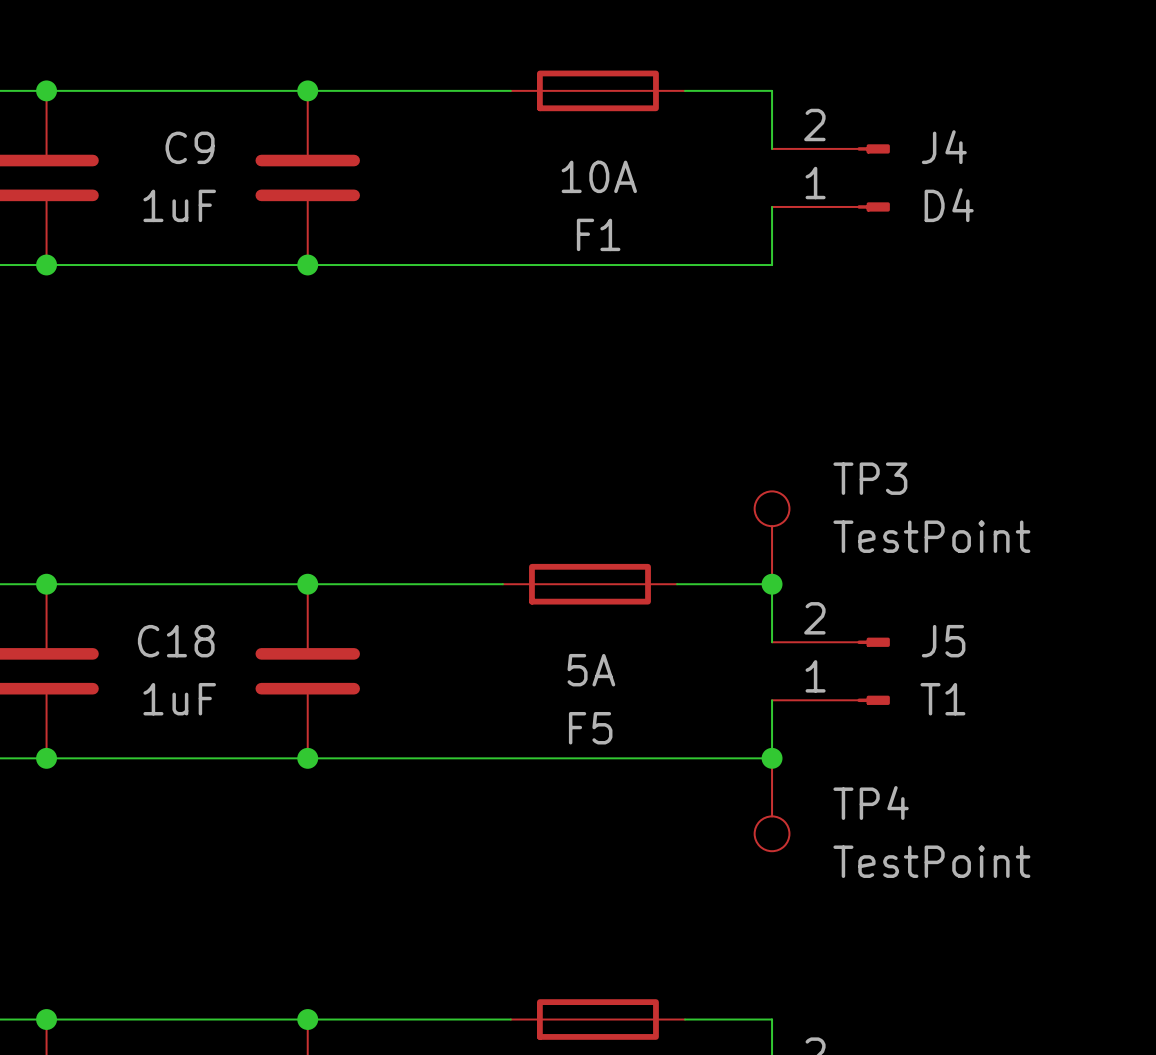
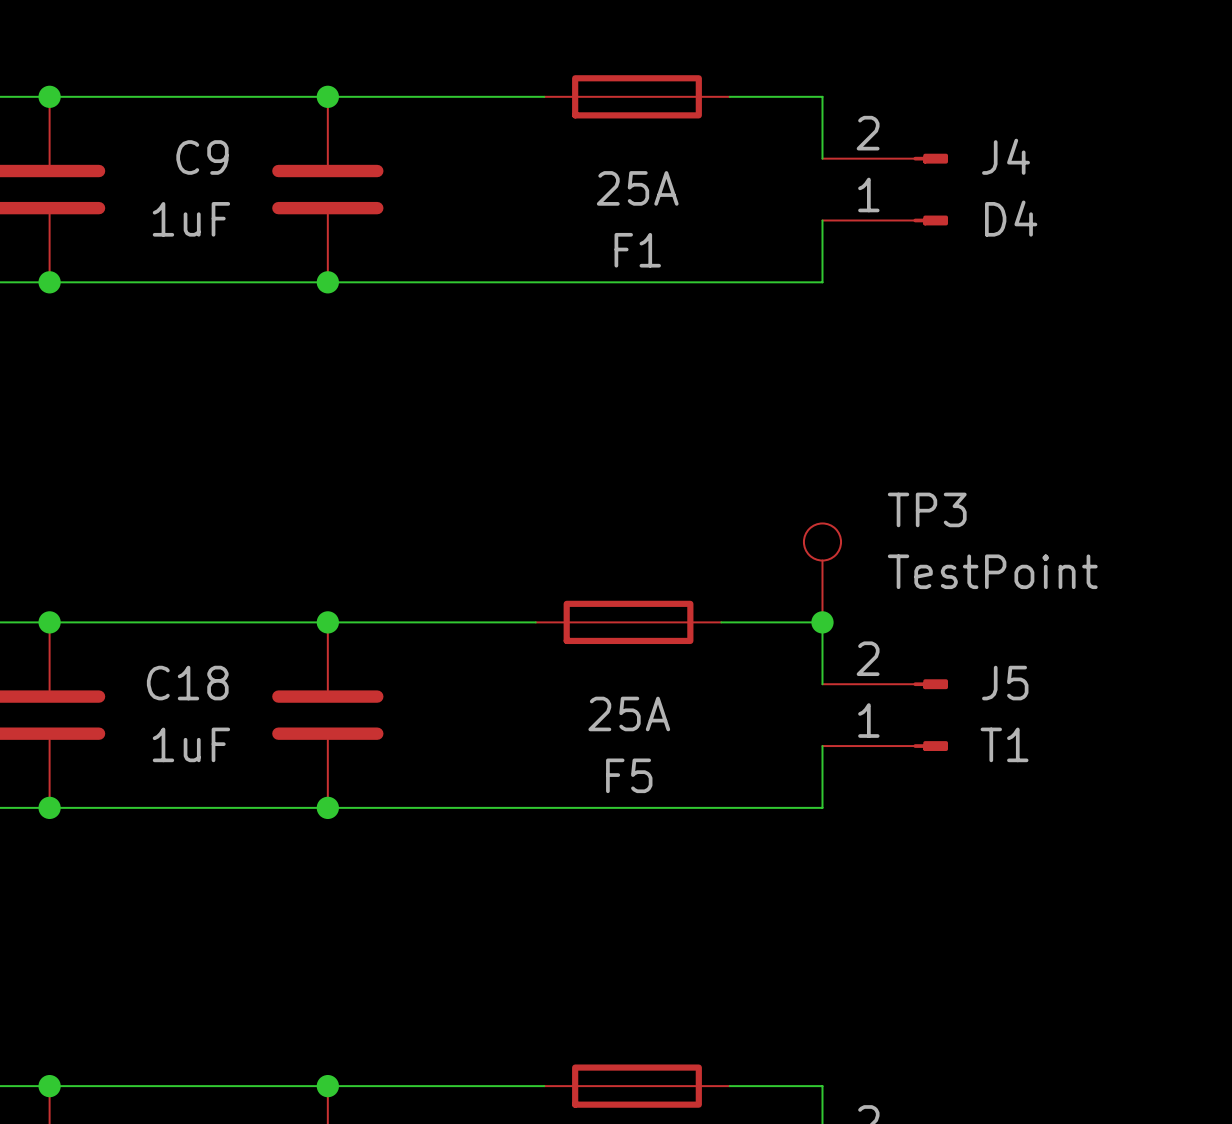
F1 value: 10A (599, 176) -> 25A (637, 188)
F5 value: 5A (591, 670) -> 25A (629, 713)
junction: (772, 758) -> none
TP4: TestPoint (772, 804) -> none

